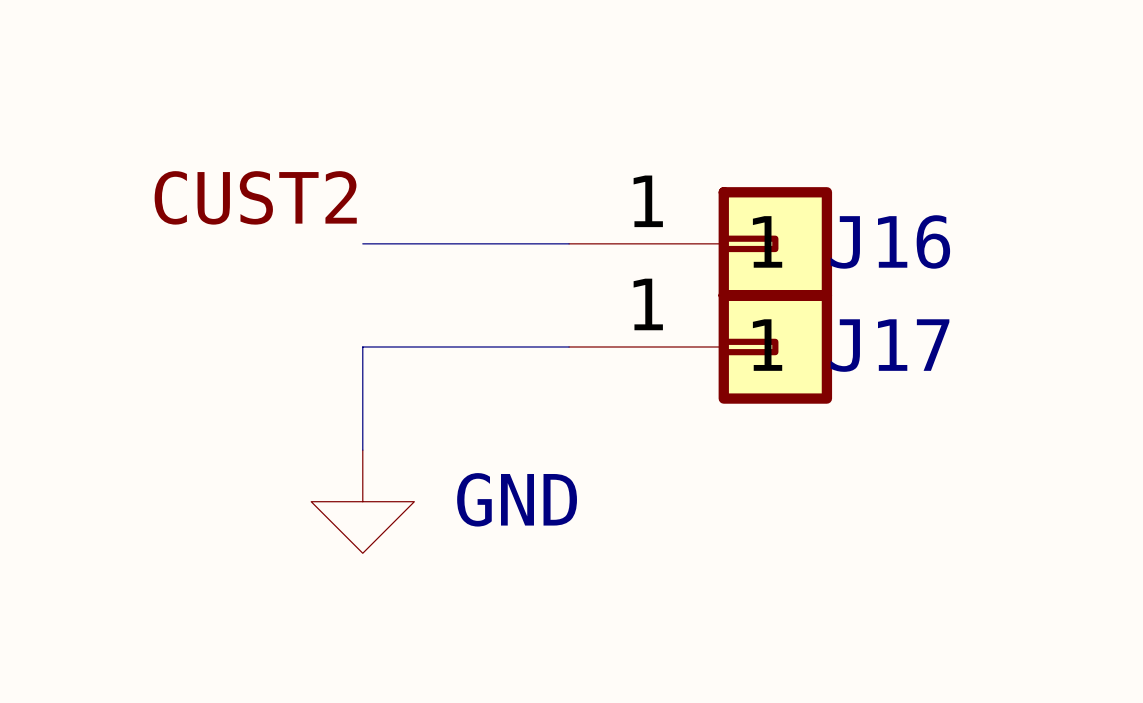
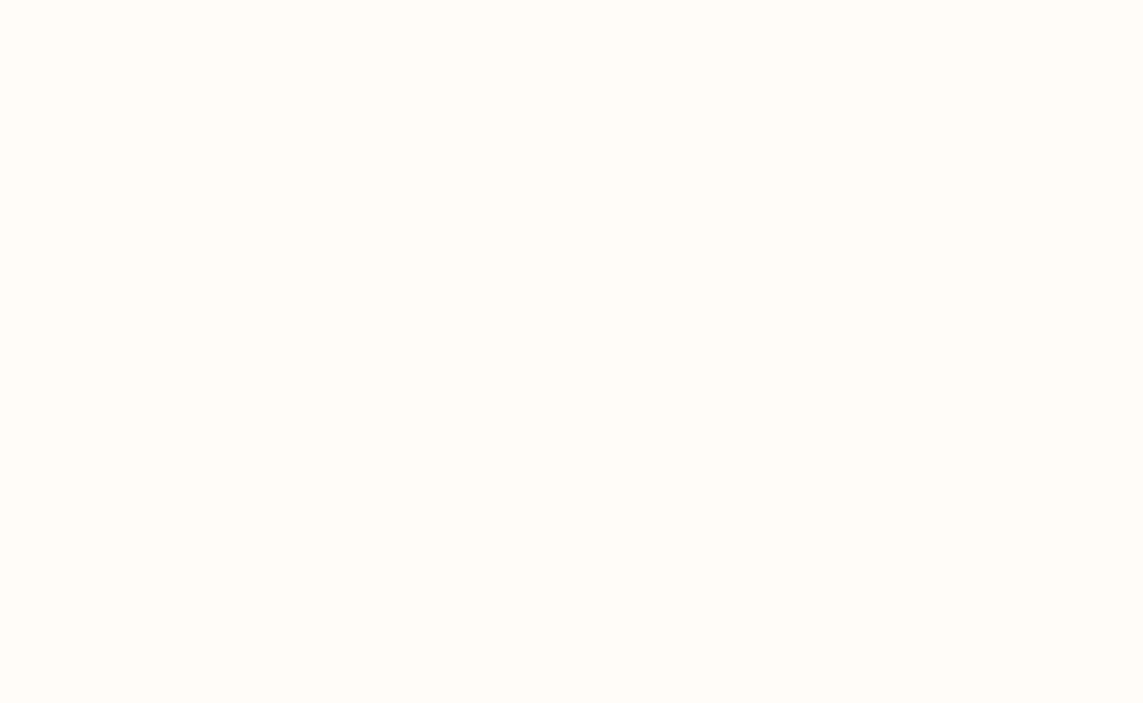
label: CUST2 (255, 197) -> none
wire: (362, 243) (569, 243) -> none
J16: (700, 243) -> none
wire: (569, 346) (362, 346) (362, 450) -> none
J17: (700, 346) -> none
power symbol: GND (362, 501) -> none

